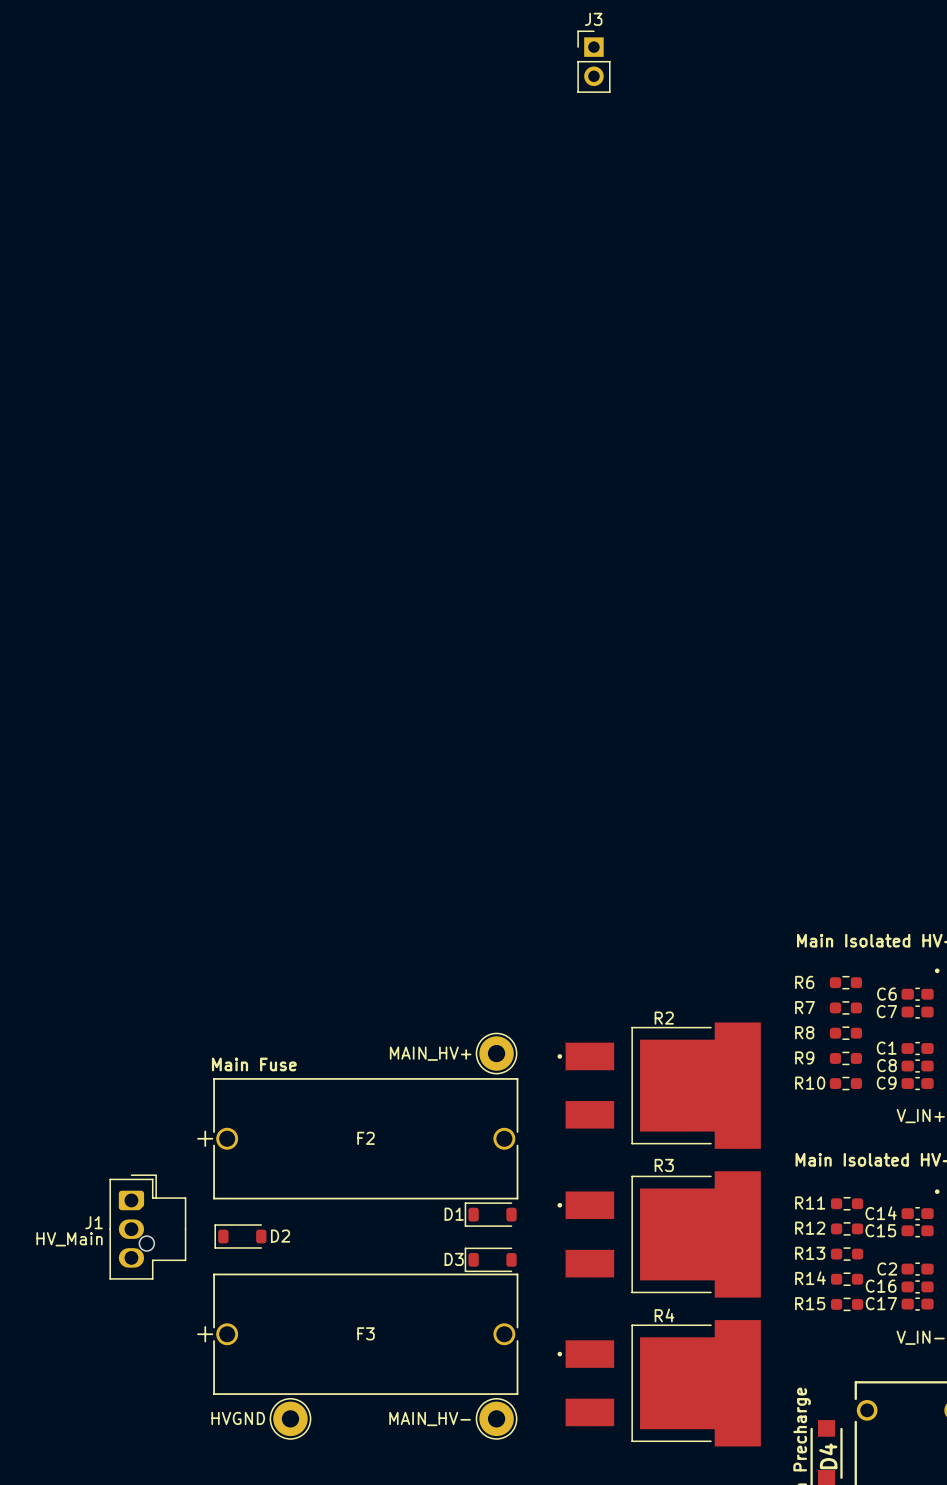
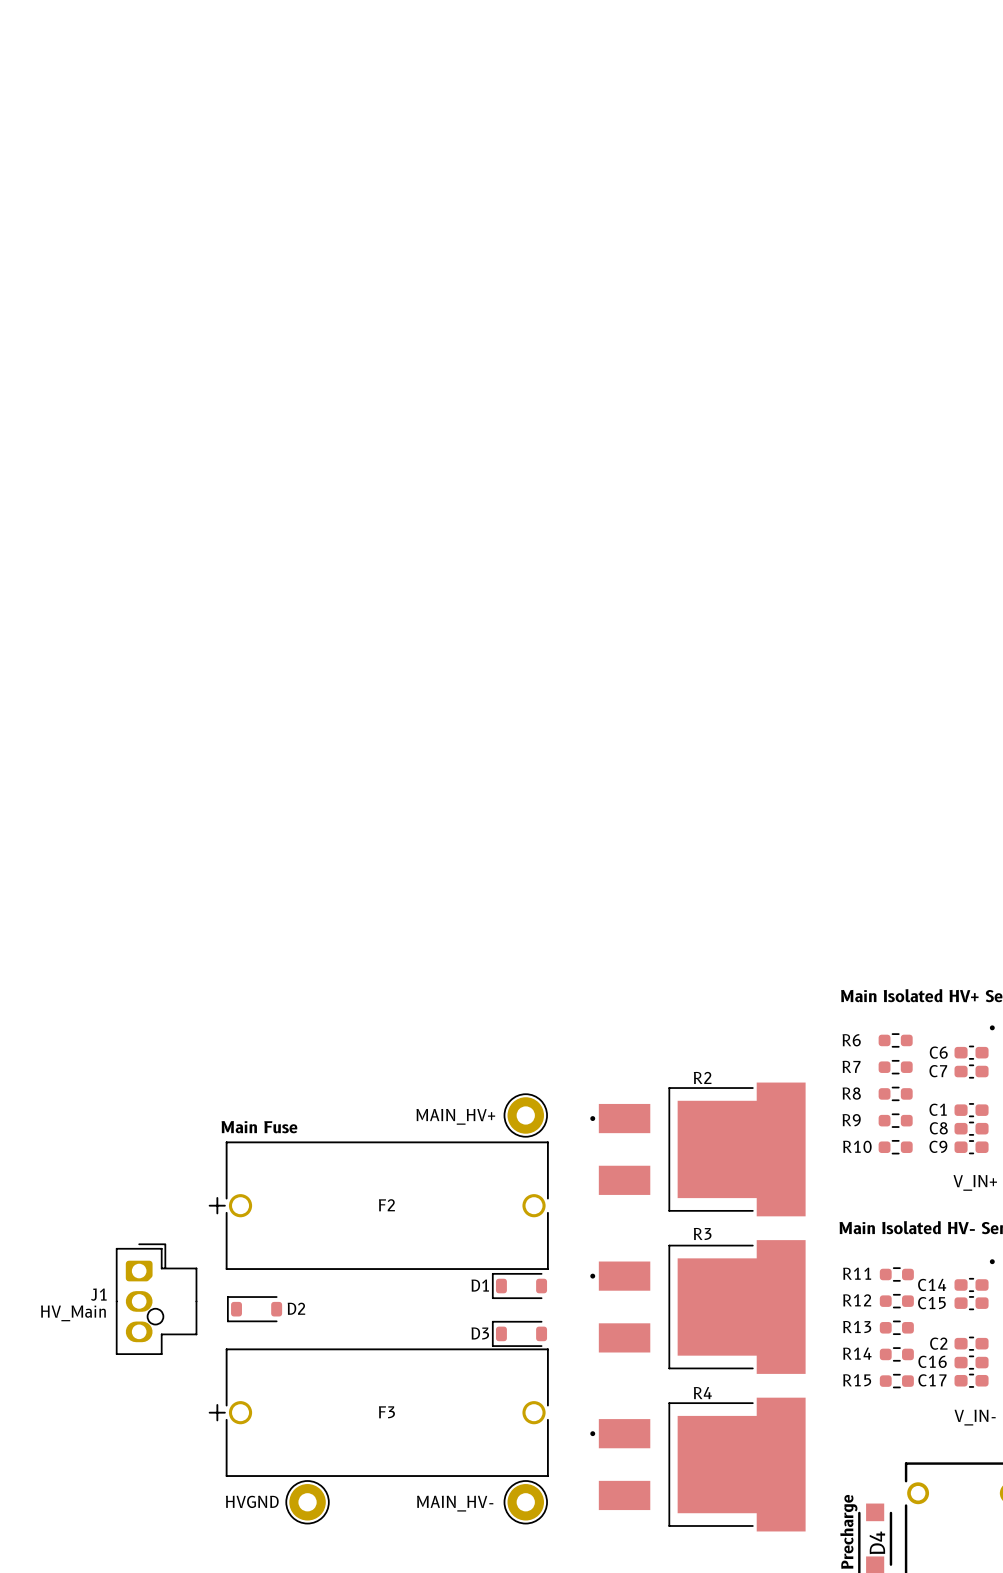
J3: (593, 61) -> none

